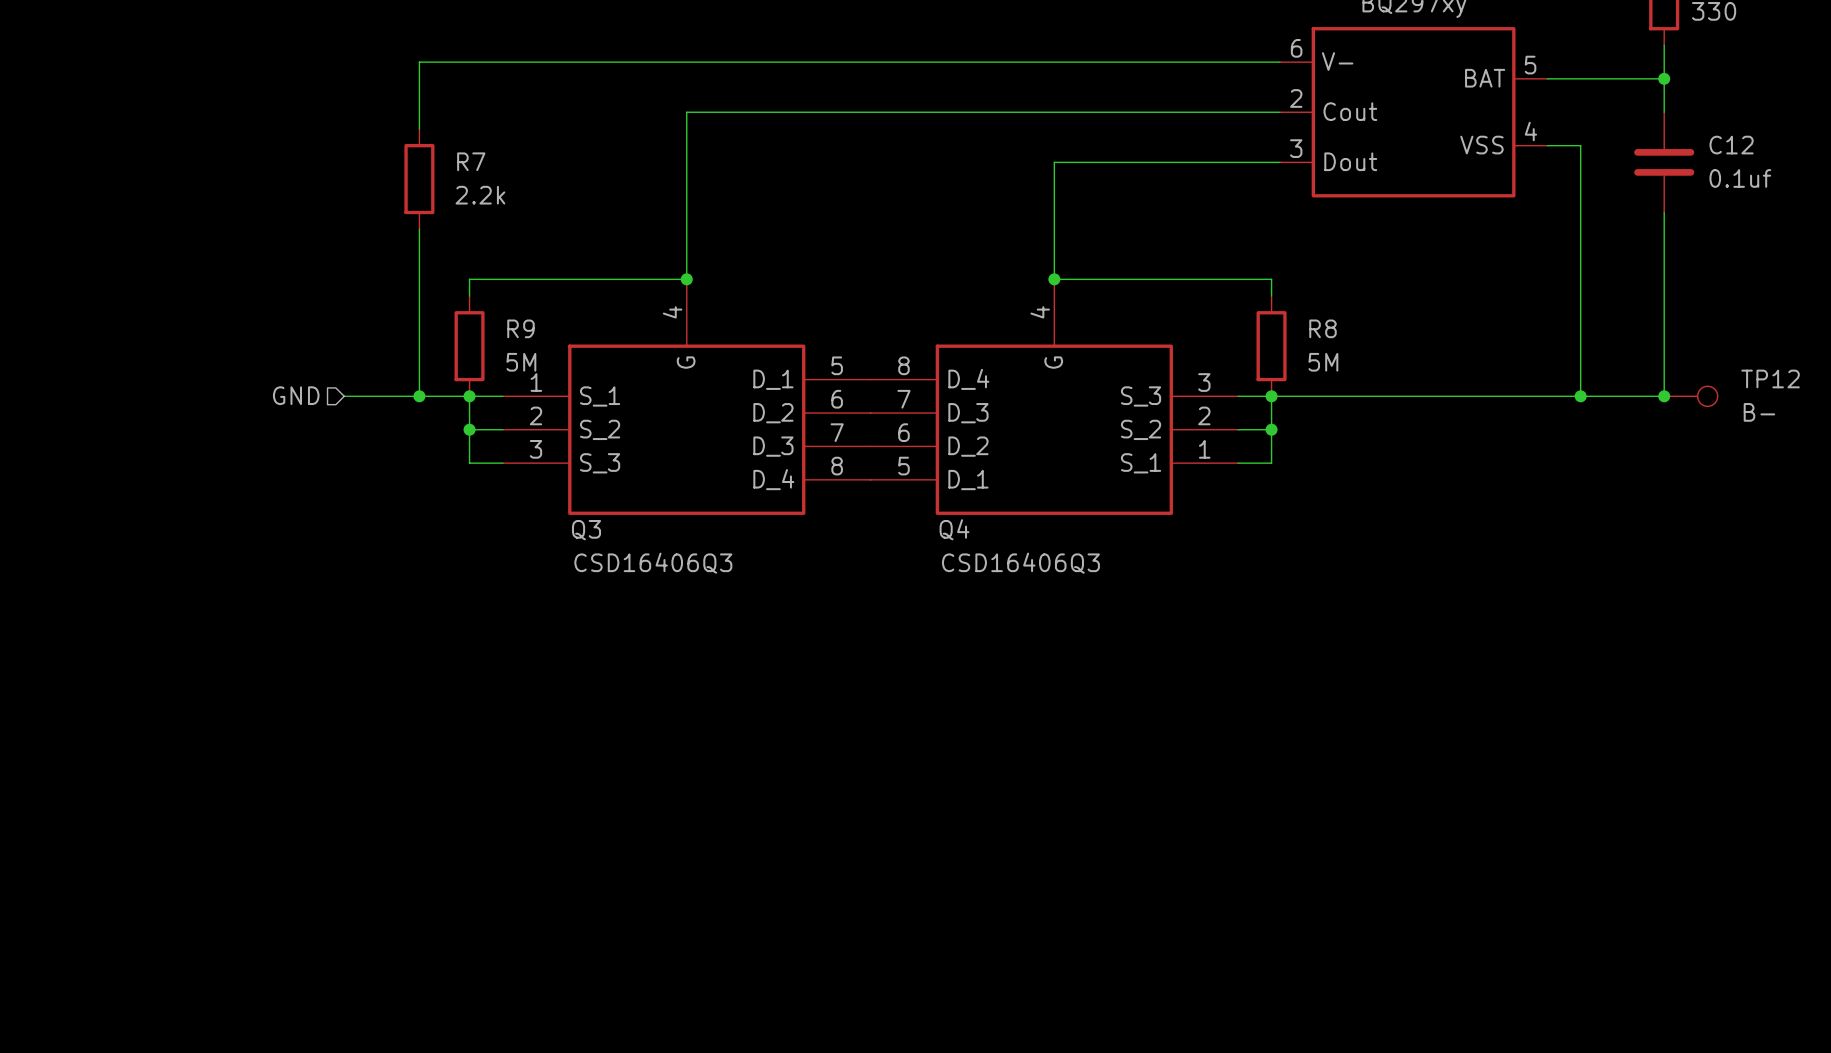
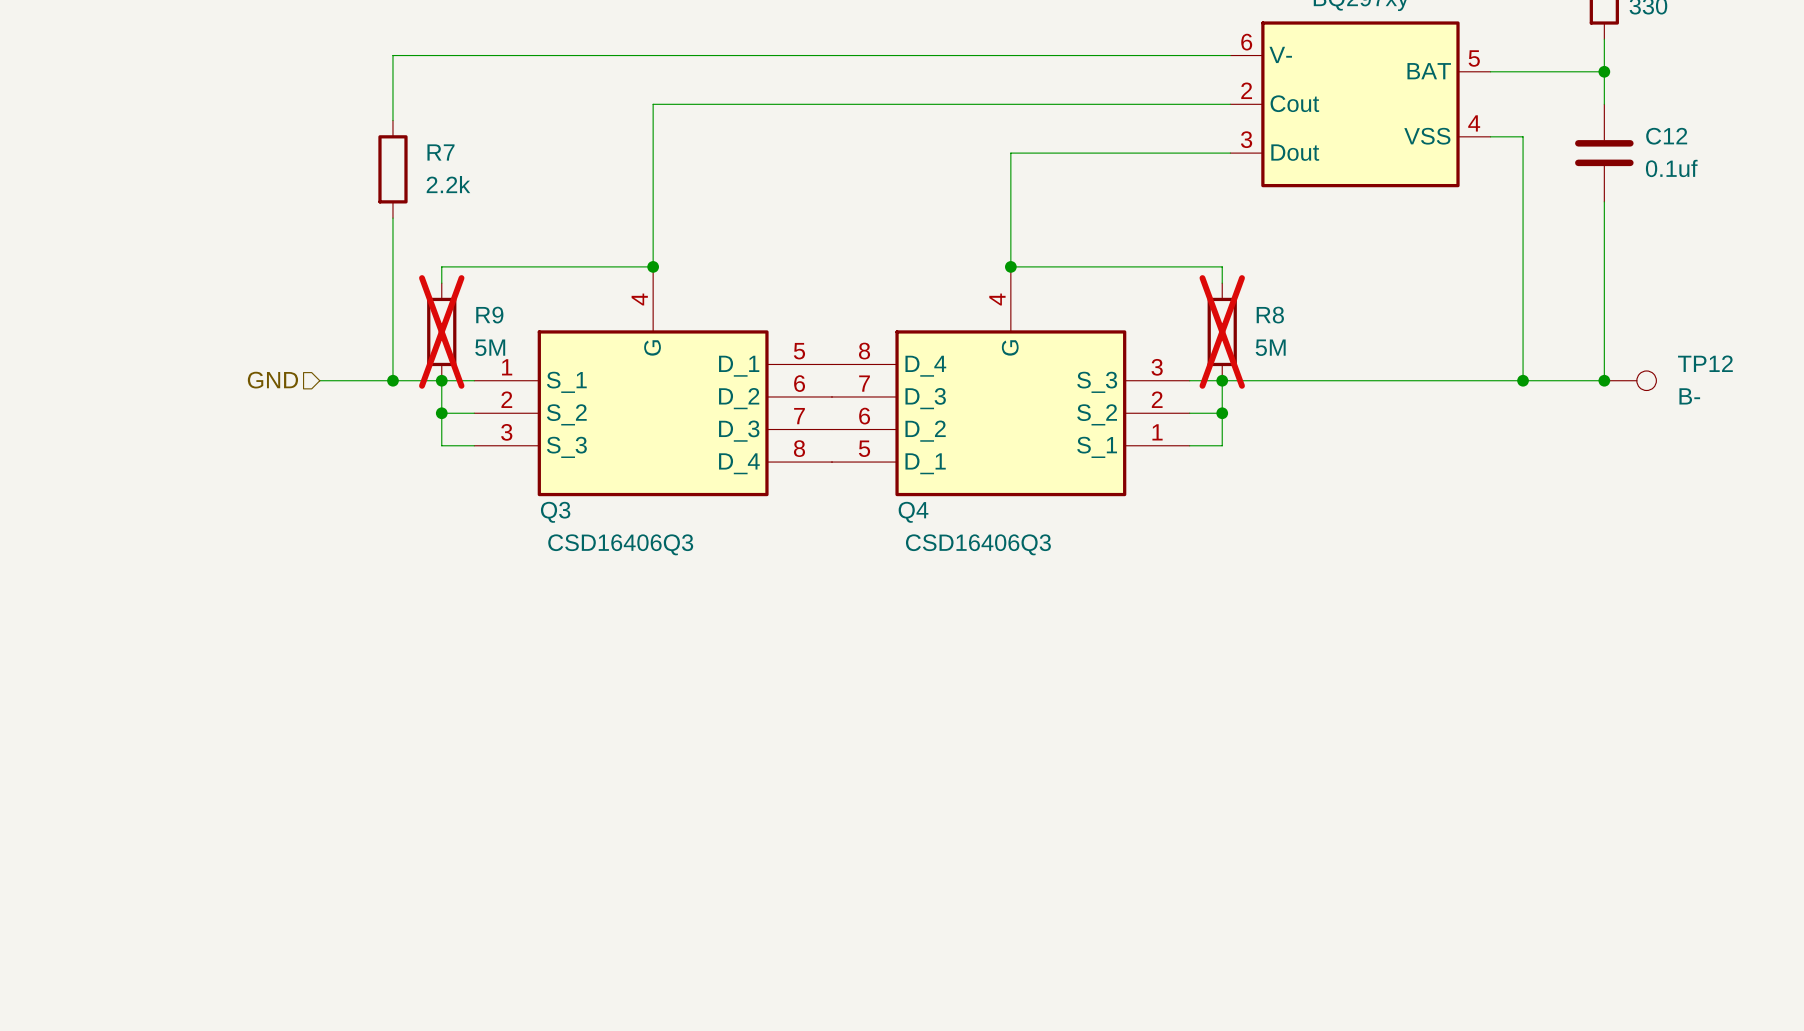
R9 do-not-place cross: none -> (441, 331)
R8 do-not-place cross: none -> (1222, 331)

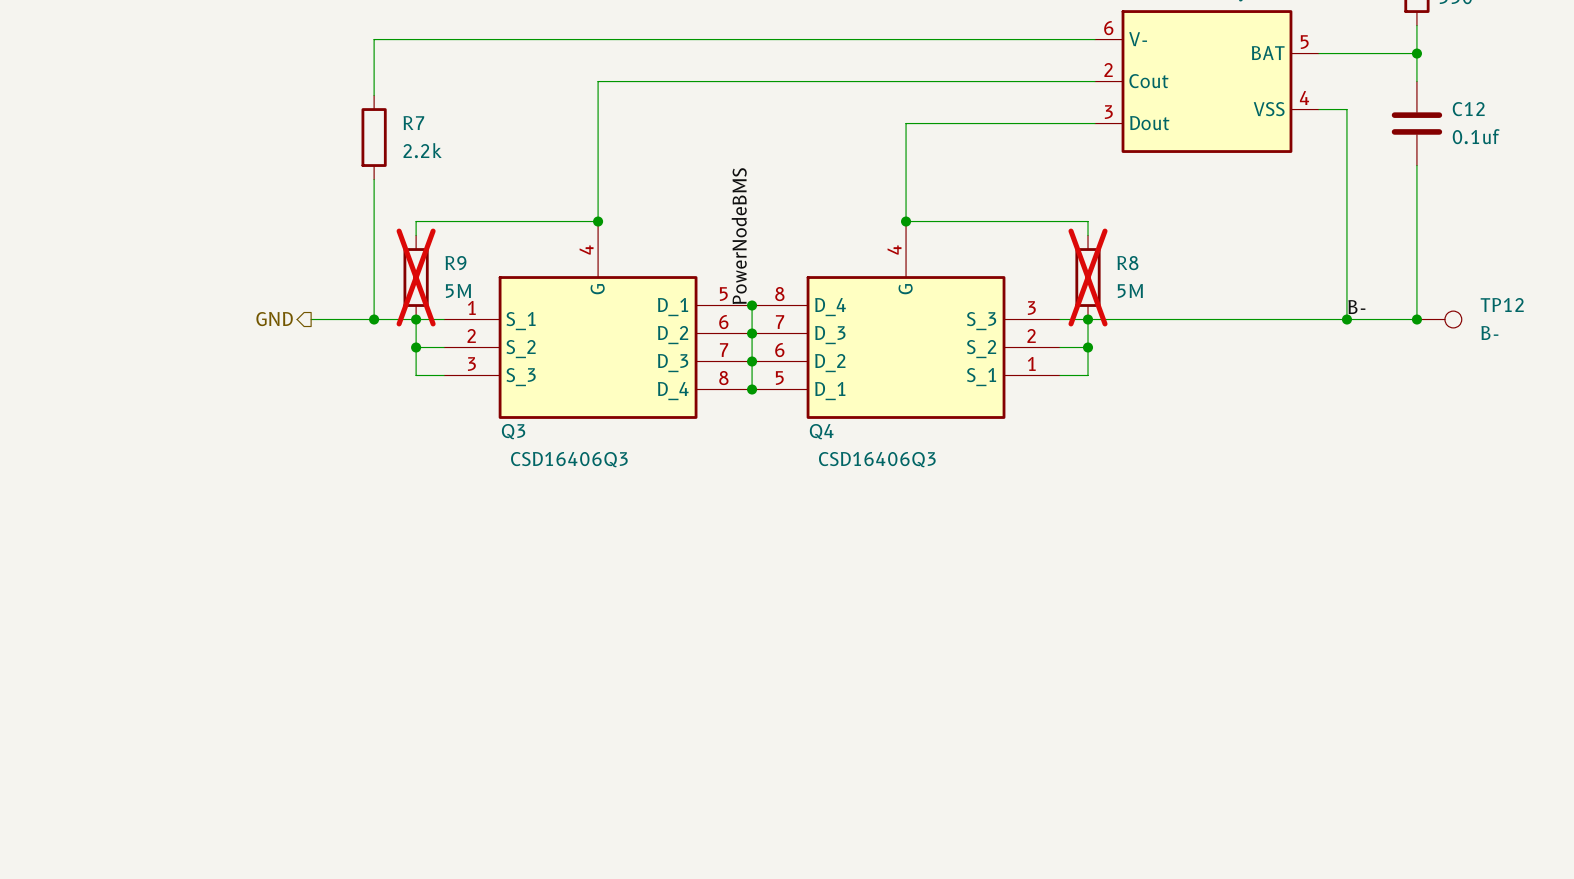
label: none -> PowerNodeBMS (739, 236)
wire: none -> (752, 305) (752, 389)
junction: none -> (752, 305)
label: none -> B- (1356, 307)
hierarchical label shape: input (272, 380) -> output (274, 319)
junction: none -> (752, 333)
junction: none -> (752, 361)
junction: none -> (752, 389)

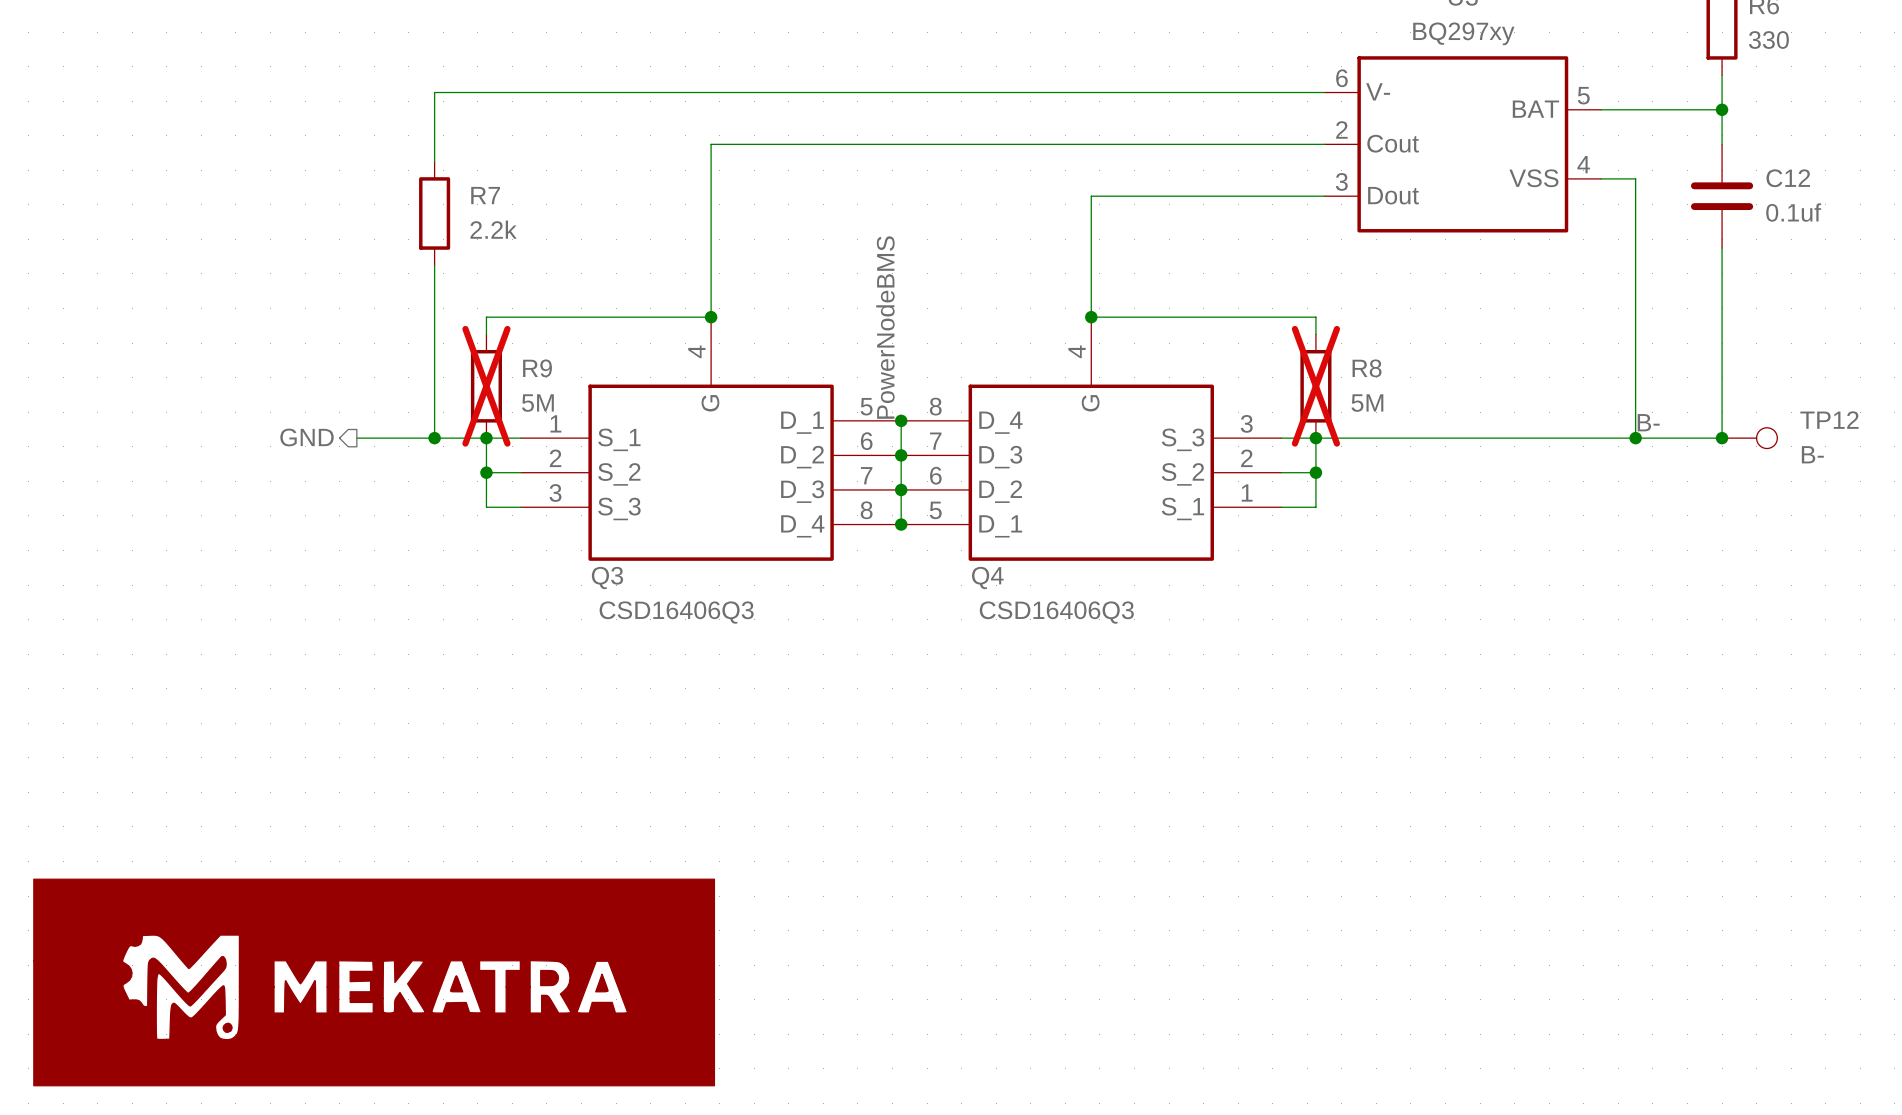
power symbol: none -> (374, 982)

